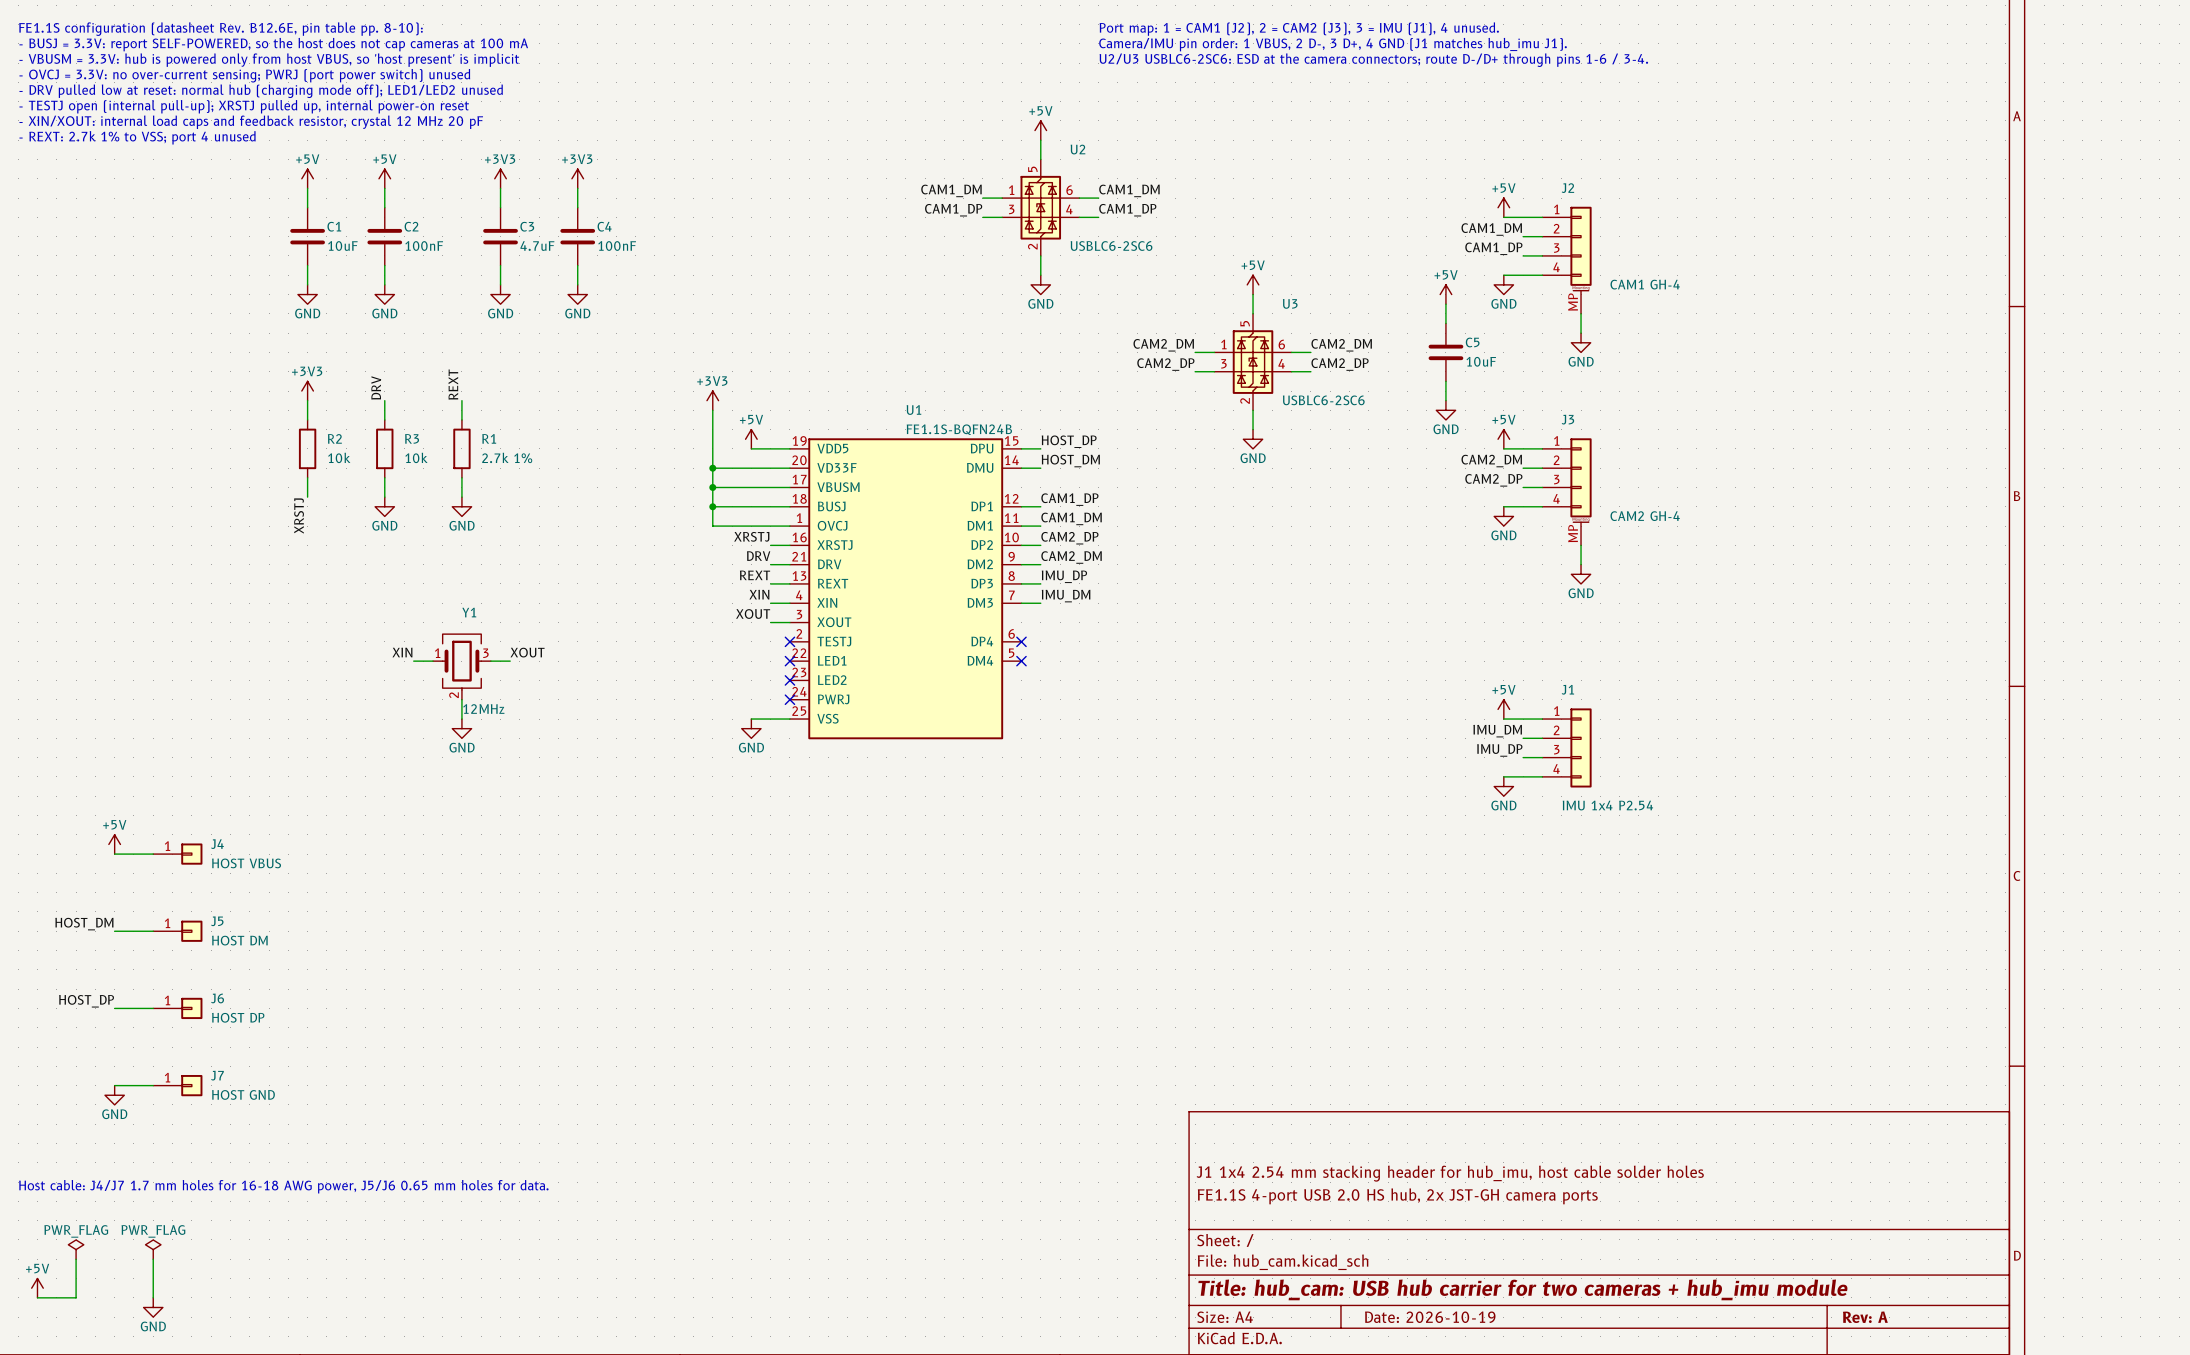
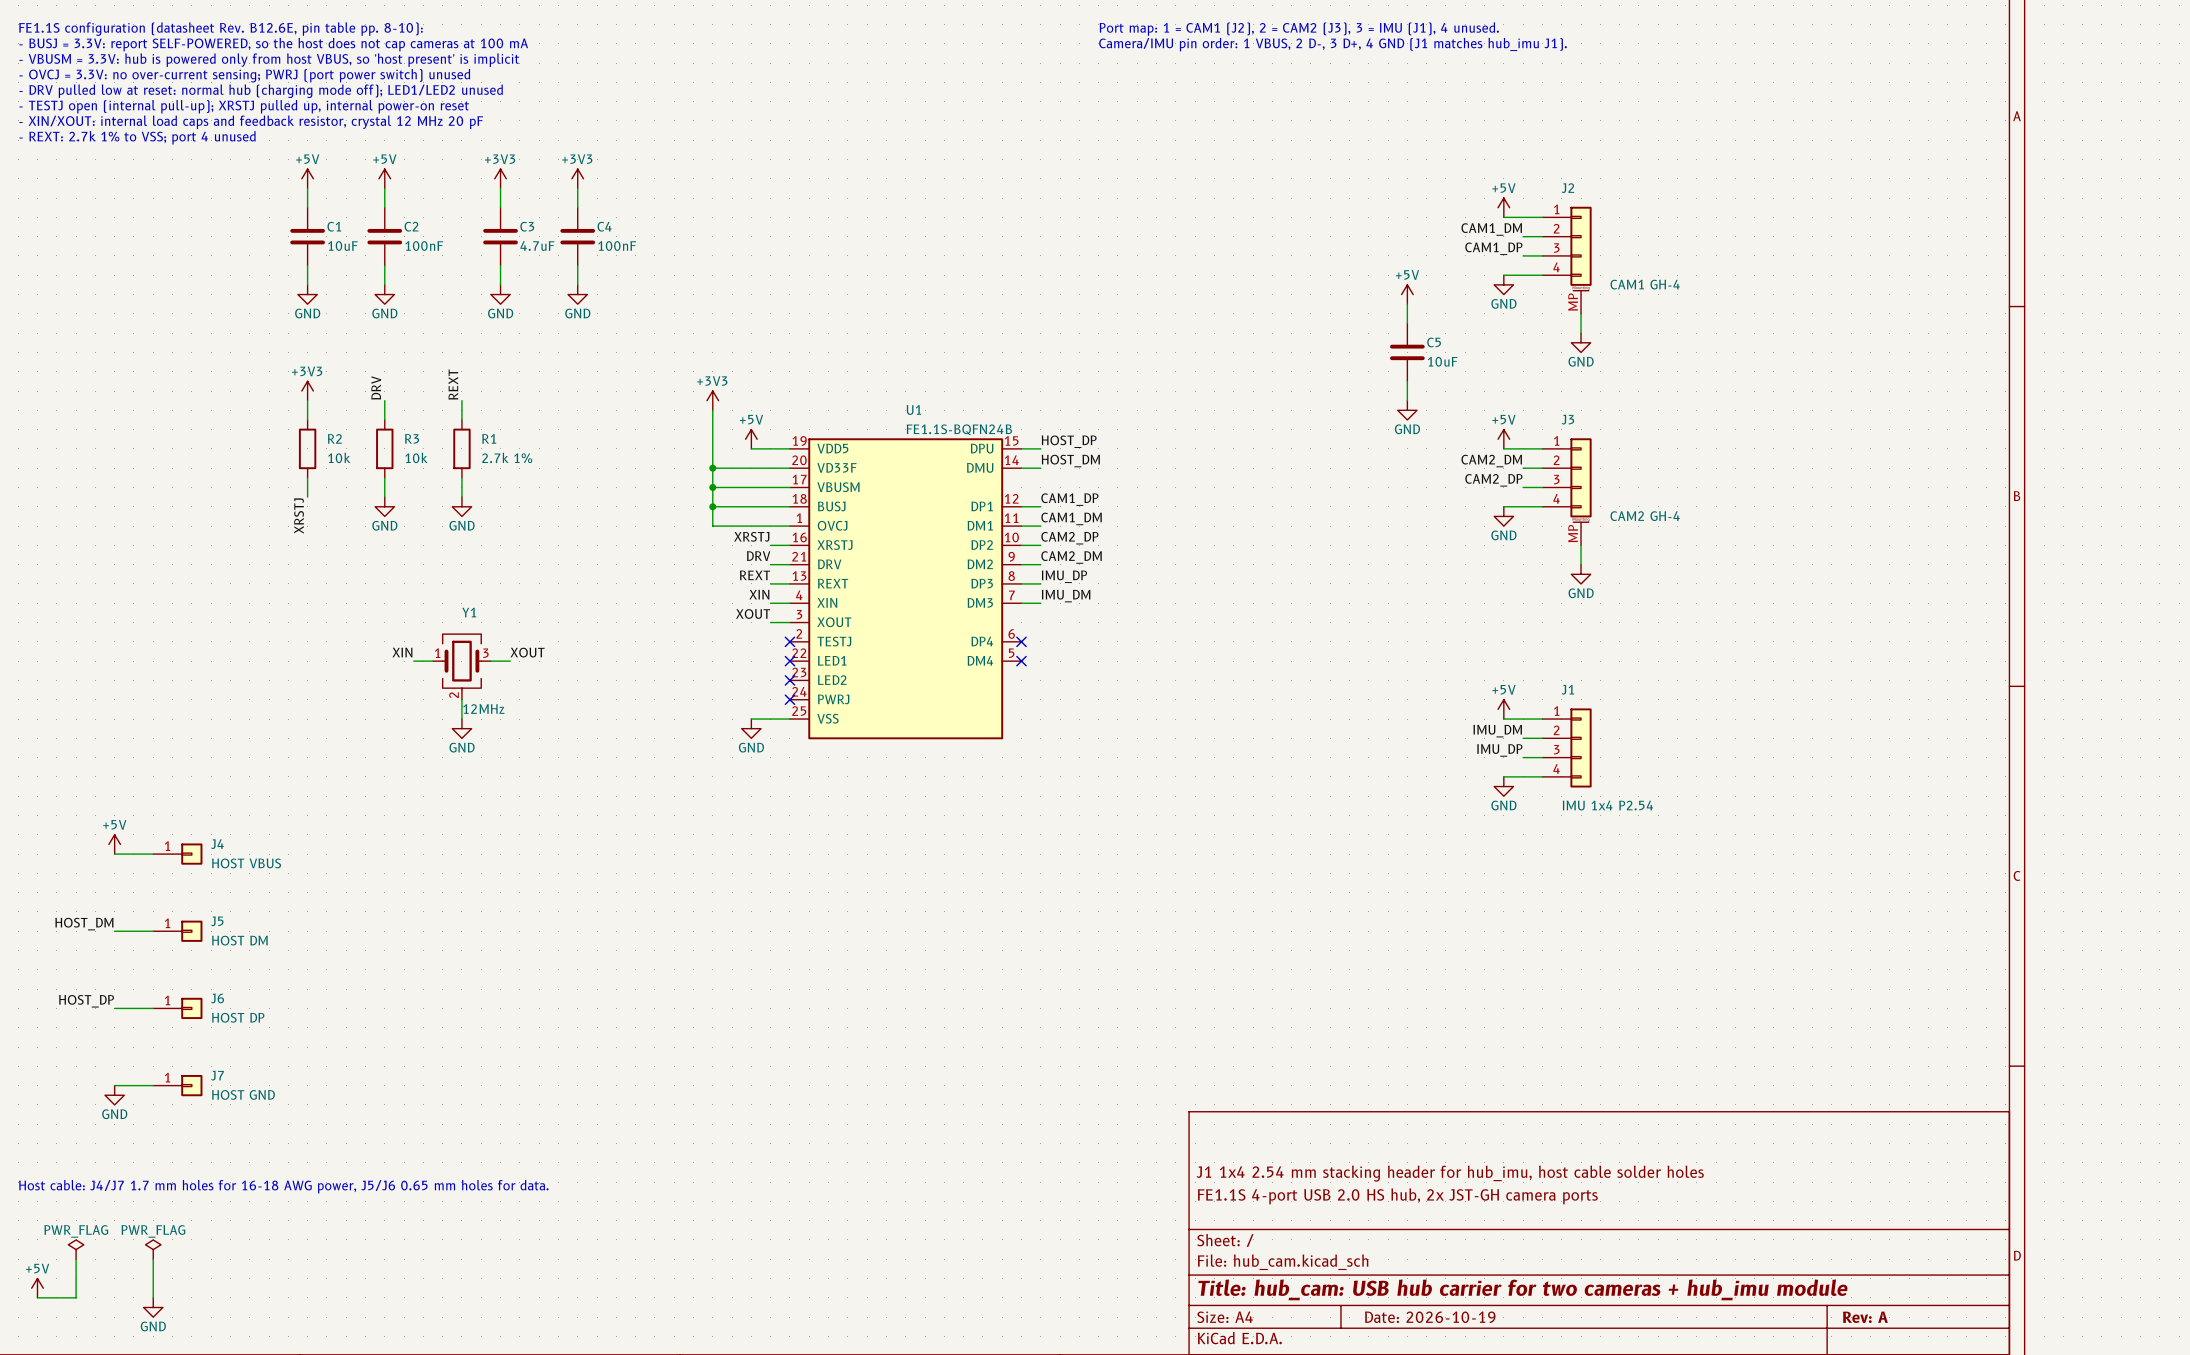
text: U2/U3 USBLC6-2SC6: ESD at the camera connectors; route D-/D+ through pins 1-6 / 3-4. (1373, 60) -> none
power symbol: +5V (1040, 130) -> none
wire: (1040, 140) (1040, 159) -> none
label: CAM1_DM (951, 190) -> none
label: CAM1_DM (1129, 190) -> none
wire: (982, 198) (1002, 198) -> none
wire: (1079, 198) (1098, 198) -> none
U2: USBLC6-2SC6 (1040, 207) -> none
label: CAM1_DP (953, 210) -> none
label: CAM1_DP (1127, 210) -> none
wire: (982, 217) (1002, 217) -> none
wire: (1079, 217) (1098, 217) -> none
wire: (1040, 255) (1040, 275) -> none
power symbol: GND (1040, 284) -> none
power symbol: +5V (1253, 284) -> none
wire: (1253, 294) (1253, 313) -> none
power symbol position: +5V (1445, 294) -> +5V (1407, 294)
wire: (1445, 304) (1445, 323) -> (1407, 304) (1407, 323)
label: CAM2_DM (1163, 345) -> none
label: CAM2_DM (1341, 345) -> none
wire: (1195, 352) (1214, 352) -> none
wire: (1291, 352) (1310, 352) -> none
C5 position: (1445, 352) -> (1407, 352)
U3: USBLC6-2SC6 (1253, 362) -> none
label: CAM2_DP (1165, 364) -> none
label: CAM2_DP (1340, 364) -> none
wire: (1195, 371) (1214, 371) -> none
wire: (1291, 371) (1310, 371) -> none
wire: (1445, 381) (1445, 400) -> (1407, 381) (1407, 400)
wire: (1253, 410) (1253, 429) -> none
power symbol position: GND (1445, 410) -> GND (1407, 410)
power symbol: GND (1253, 439) -> none

